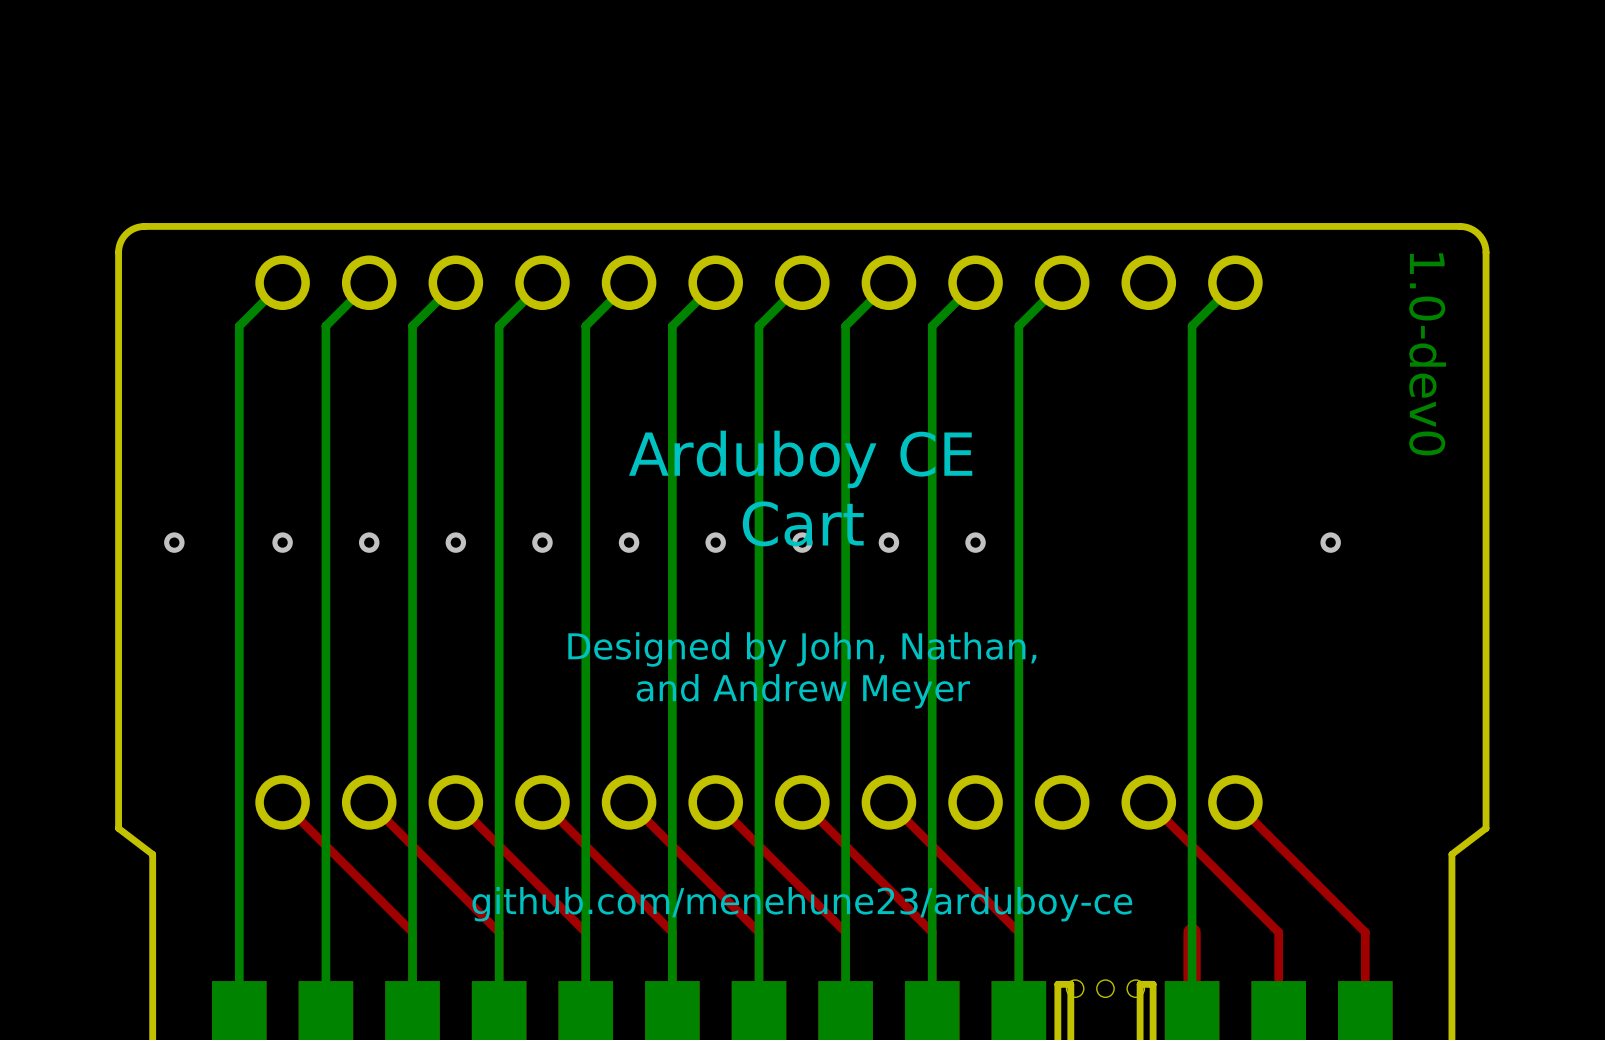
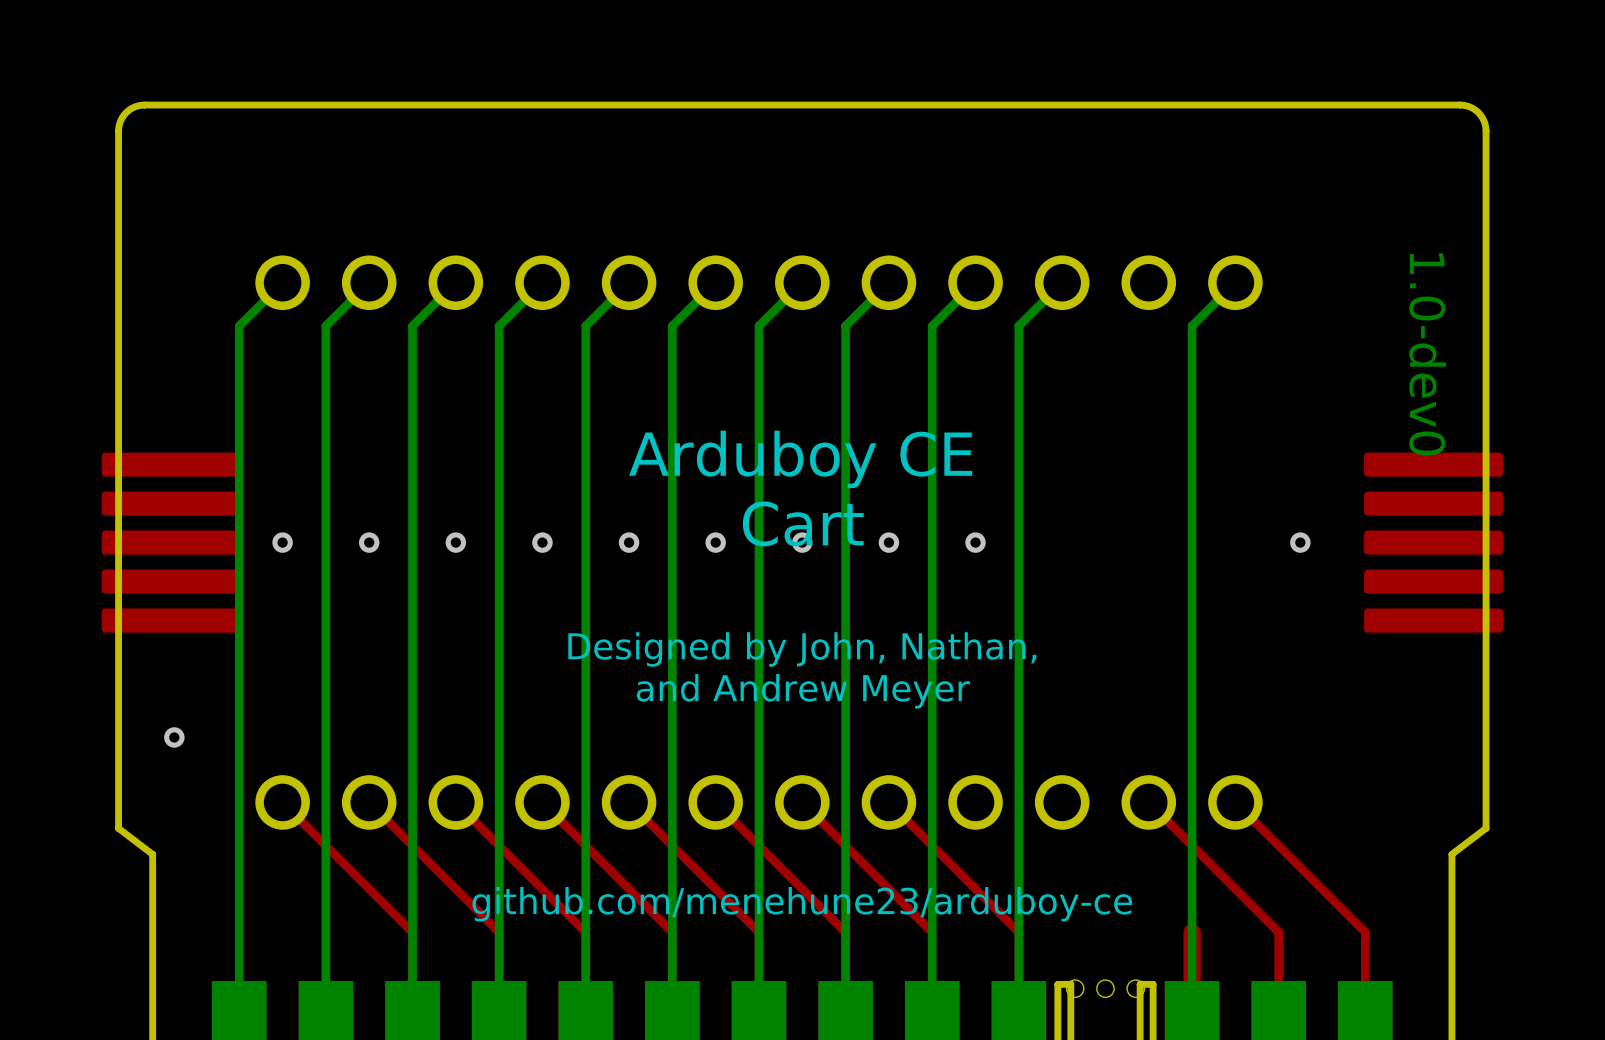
board edge: (1486, 252) (1484, 242) (1478, 234) (1470, 228) (1460, 226) (144, 226) (134, 228) (126, 234) (120, 242) (118, 252) -> (1486, 252) (1485, 127) (1482, 118) (1475, 110) (1460, 105) (141, 105) (126, 112) (118, 127) (118, 252)
drawing: none -> [101, 452, 241, 633]
drawing: none -> [1364, 452, 1503, 633]
via position: (174, 542) -> (174, 737)
via position: (1330, 542) -> (1300, 542)

